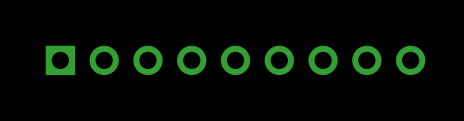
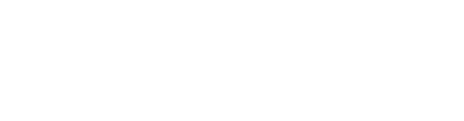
part: (235, 60) -> none

